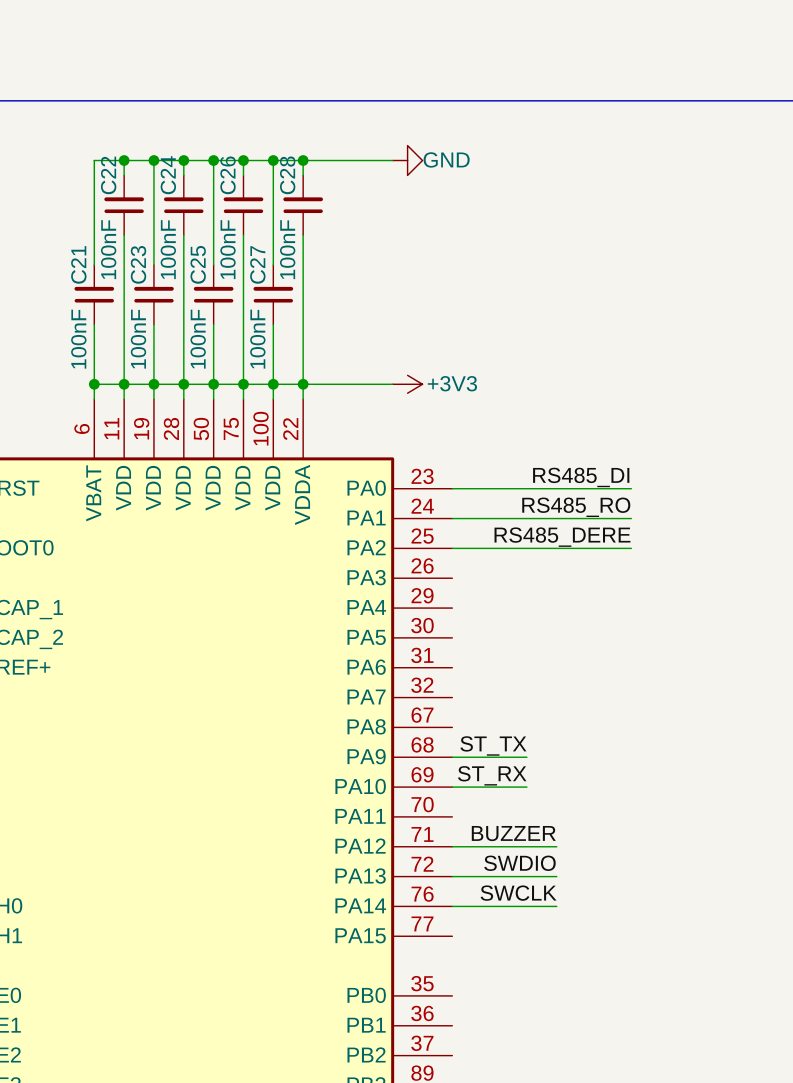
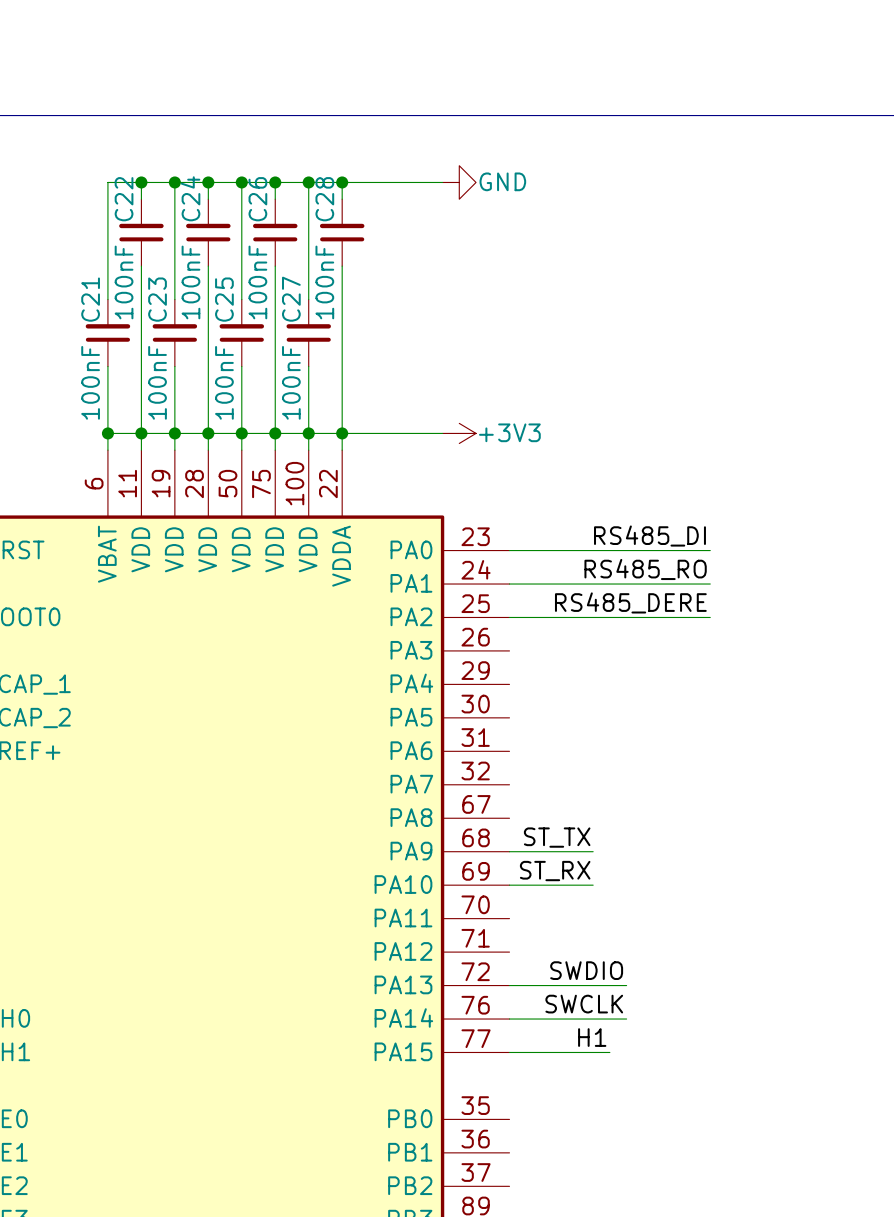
label: BUZZER (513, 833) -> none
wire: (452, 846) (556, 846) -> none
label: none -> H1 (592, 1037)
wire: none -> (509, 1052) (609, 1052)

